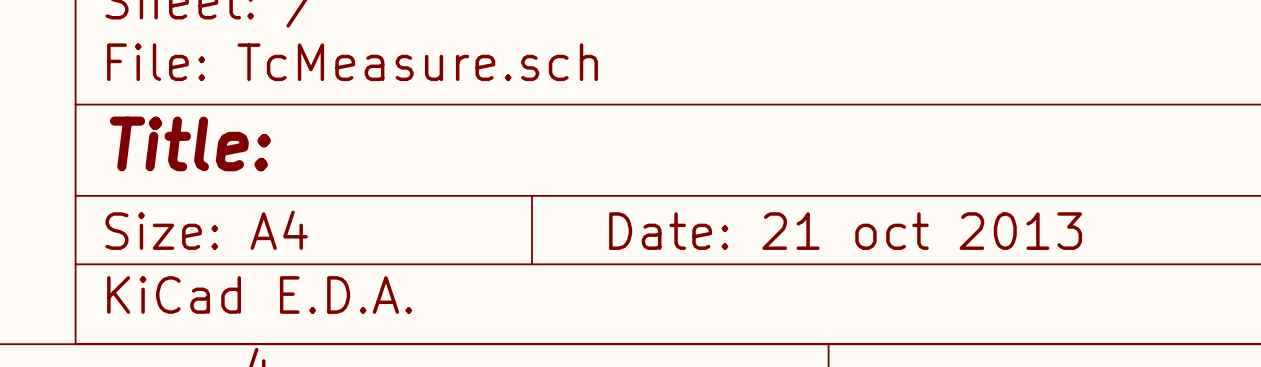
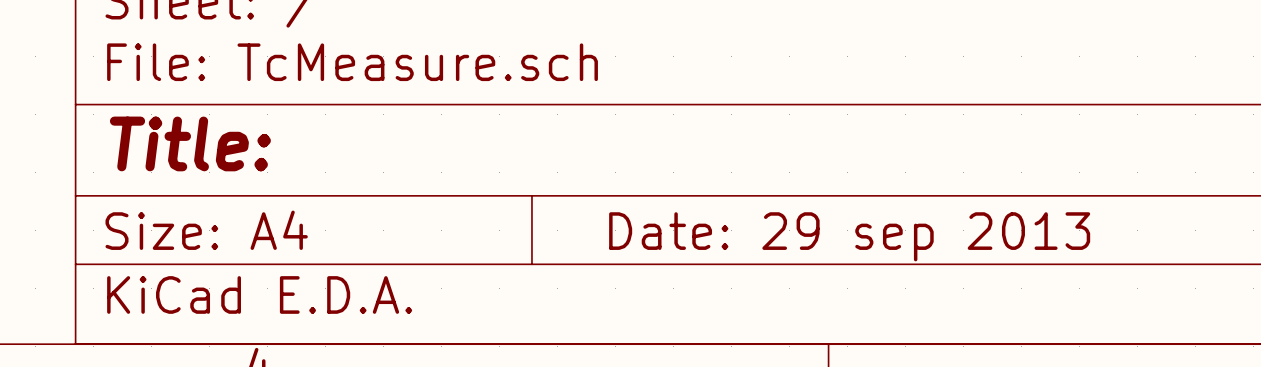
title block: Date: 21 oct 2013 (845, 231) -> Date: 29 sep 2013 (849, 236)

